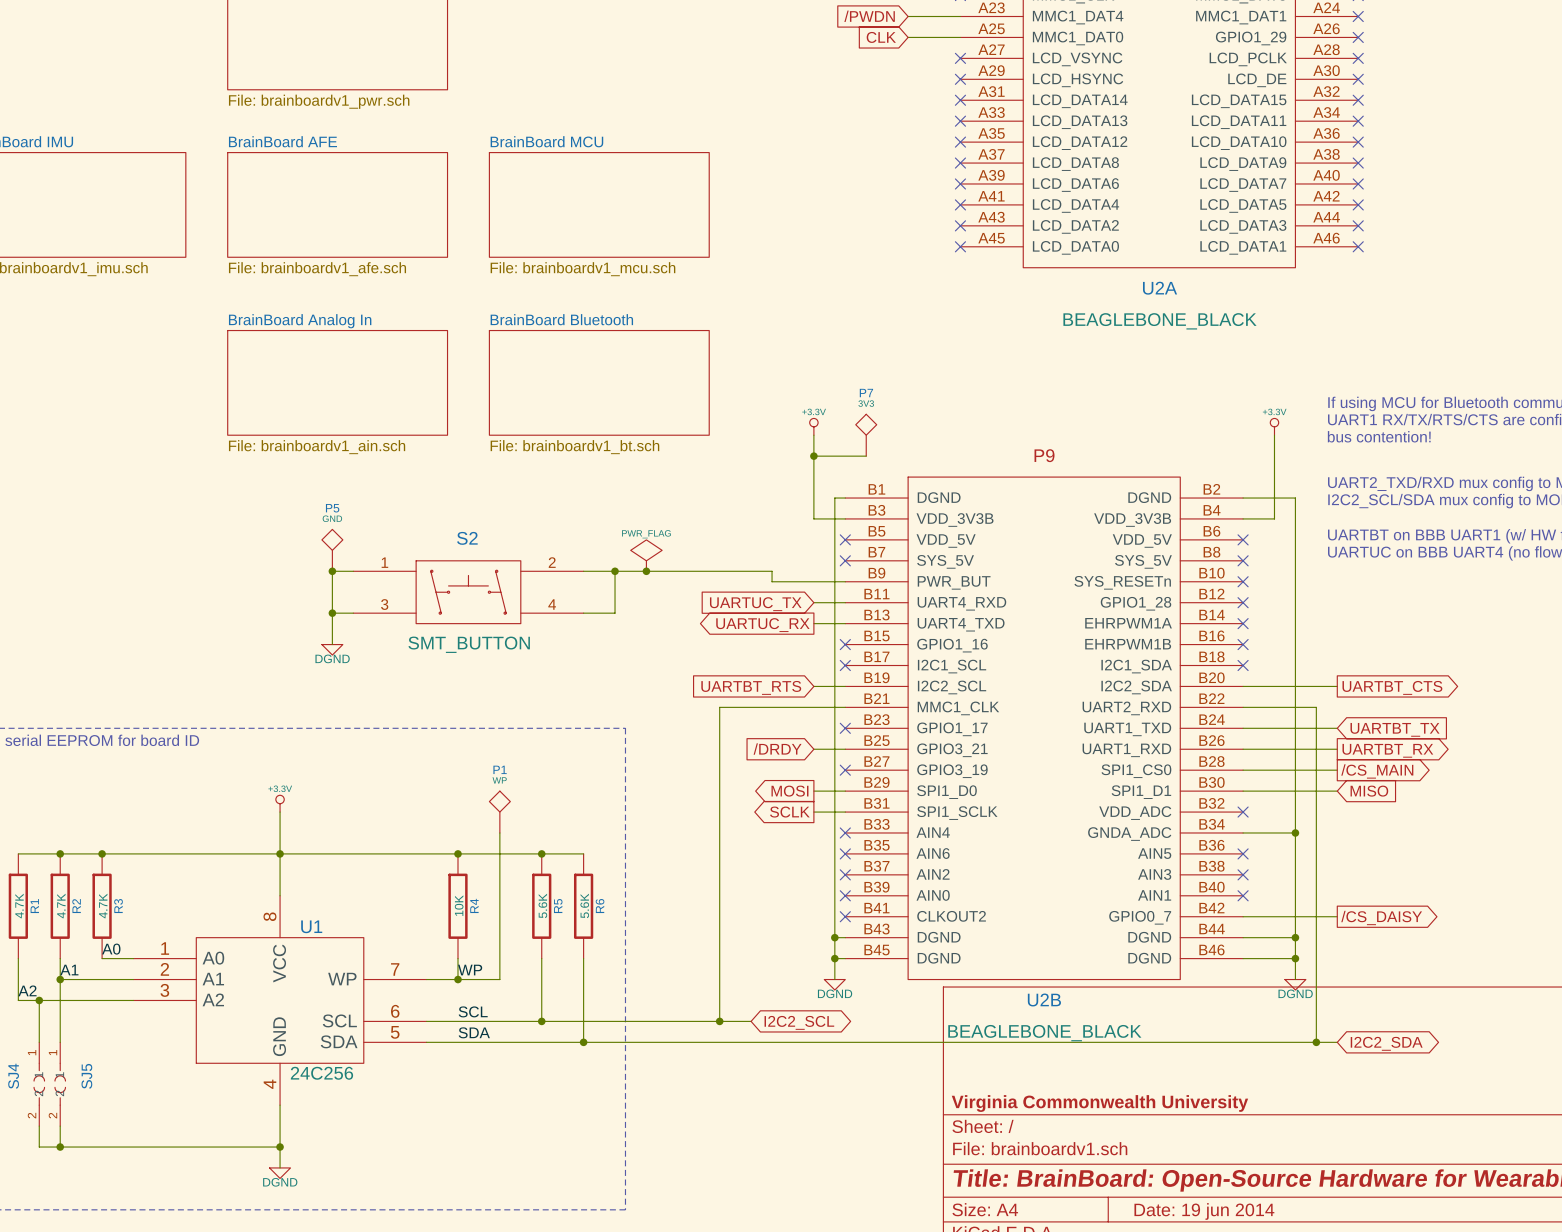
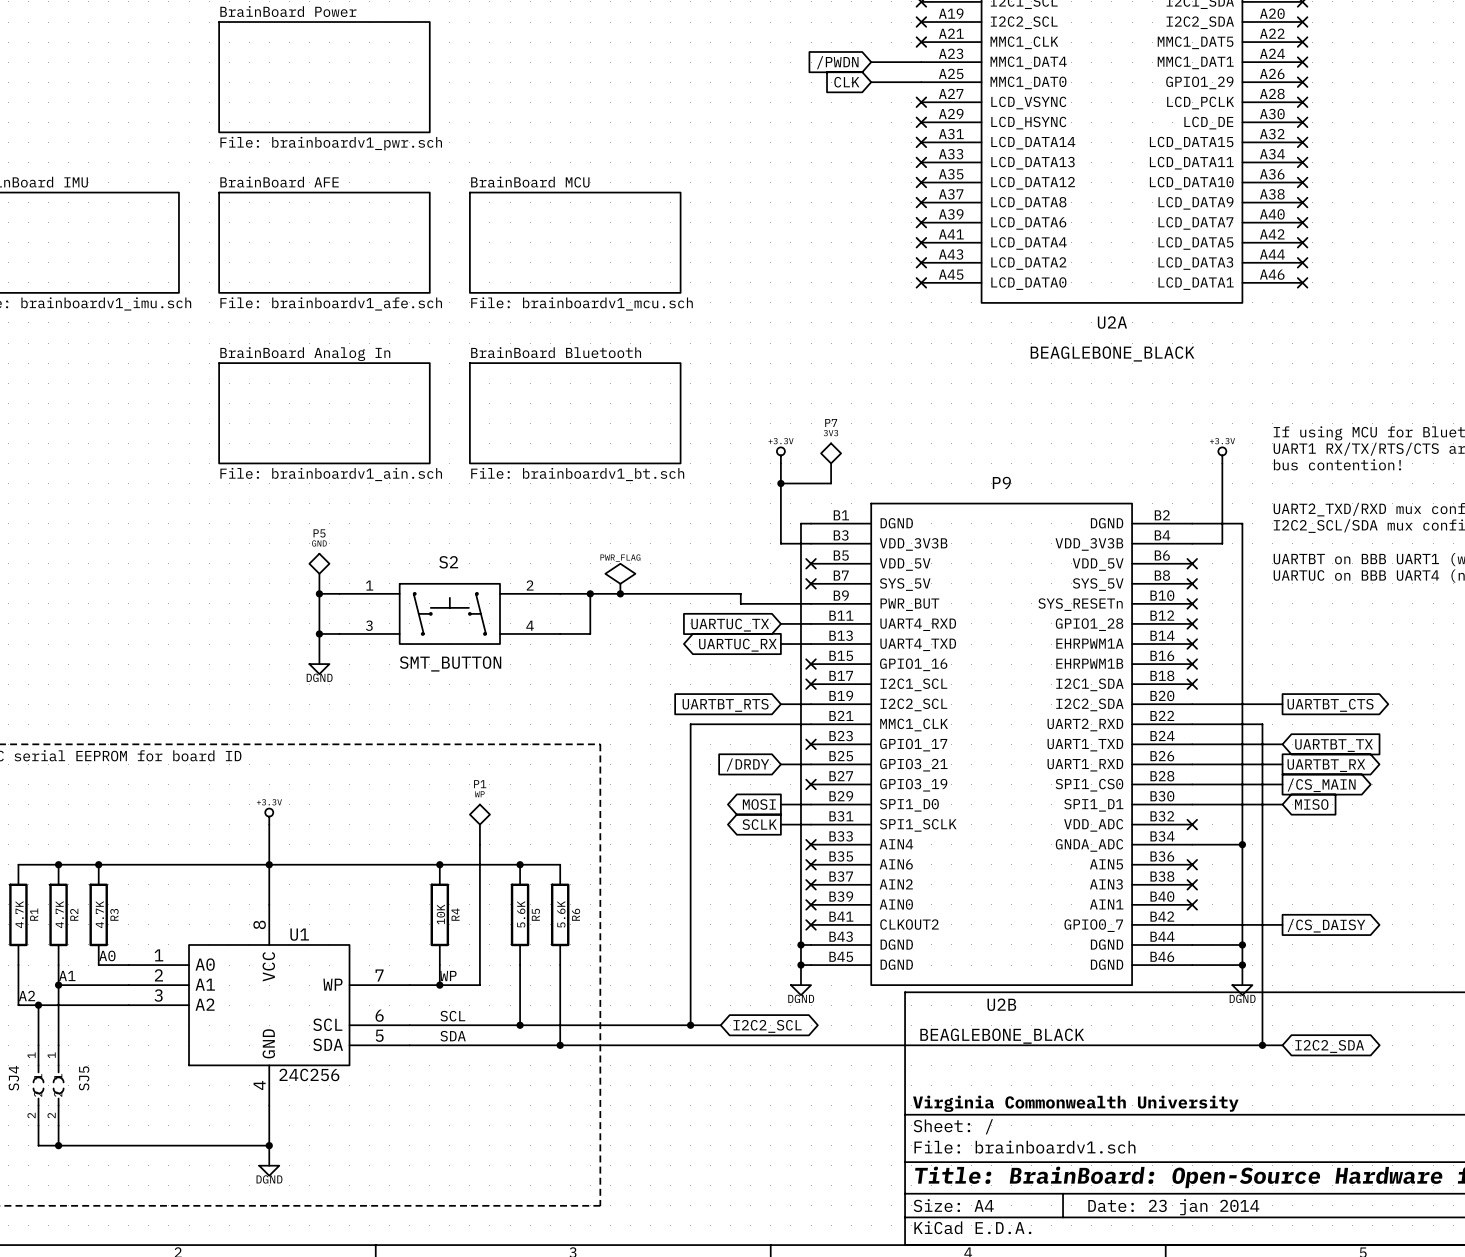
title block: Date: 19 jun 2014 (1204, 1211) -> Date: 23 jan 2014 (1173, 1207)

